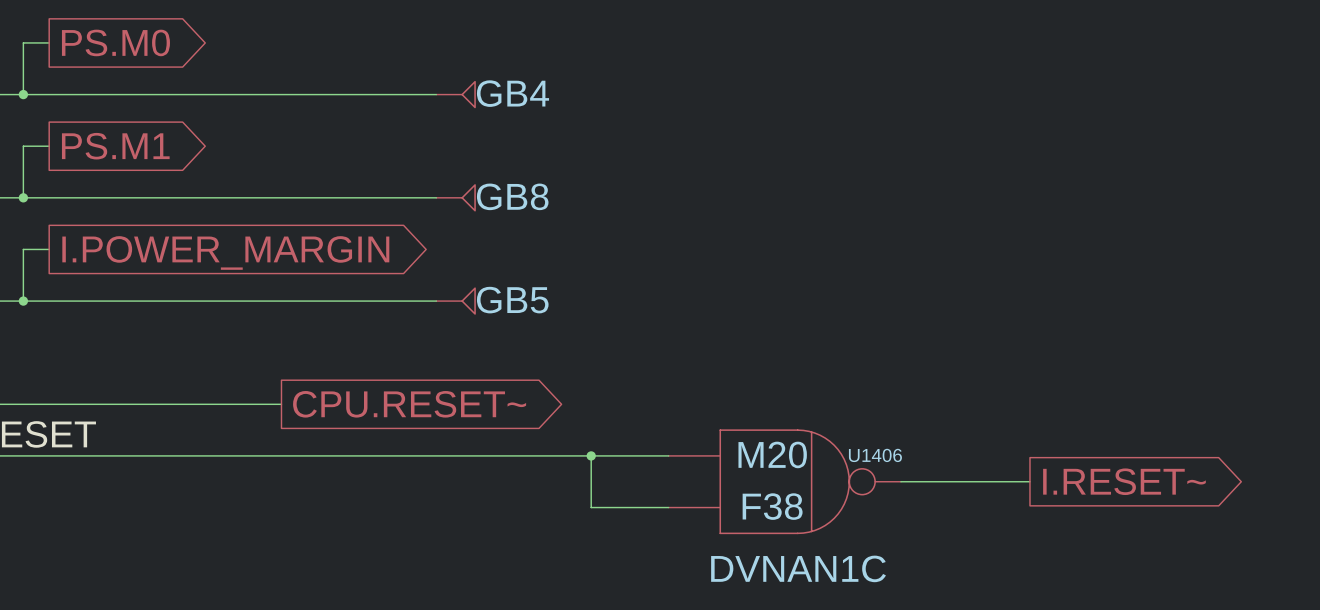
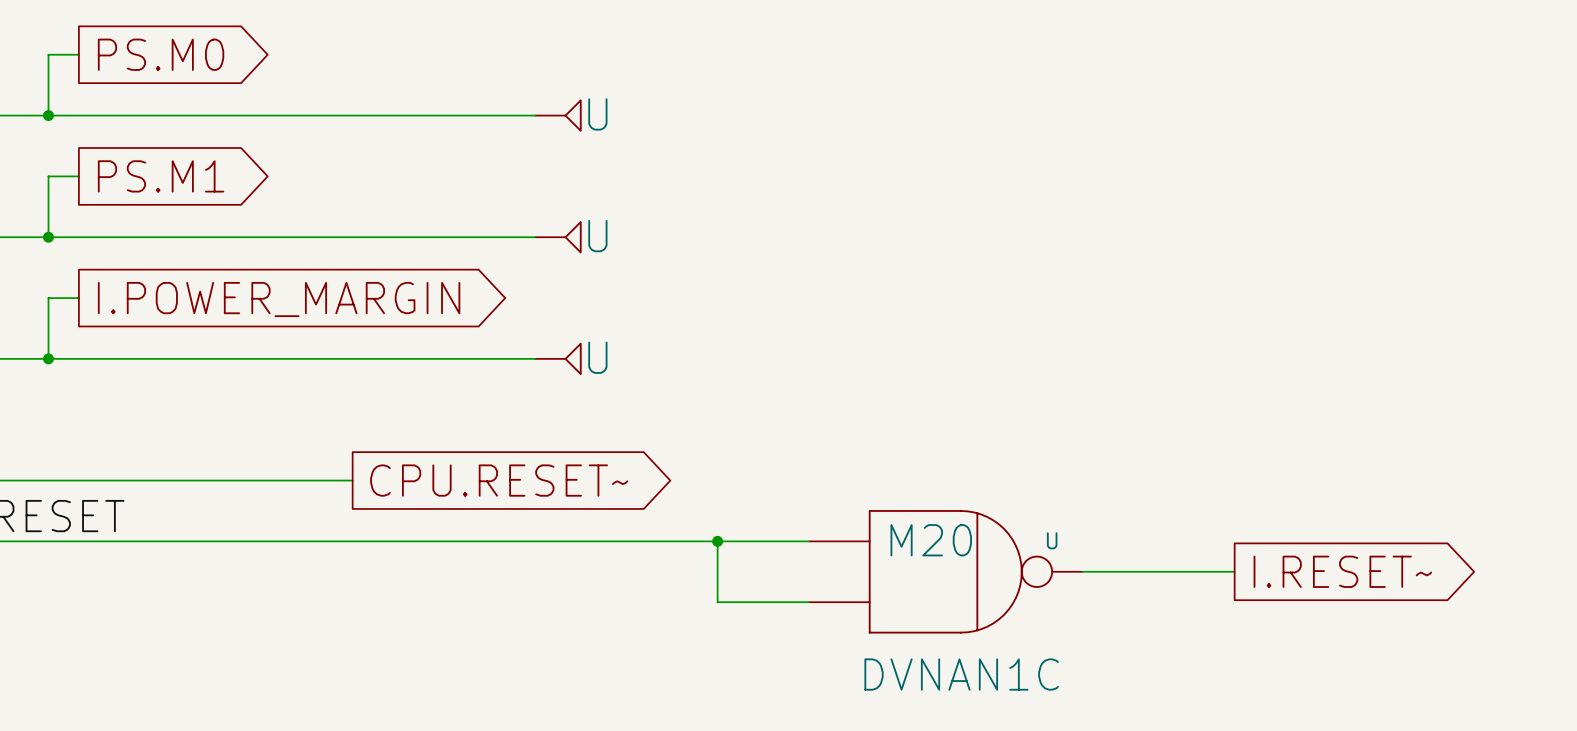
GB4 name: GB4 (512, 93) -> U (597, 114)
GB8 name: GB8 (512, 196) -> U (597, 236)
GB5 name: GB5 (512, 300) -> U (597, 357)
U1406 name: U1406 (875, 455) -> U (1052, 540)
U1406 value: F38 (772, 506) -> none

